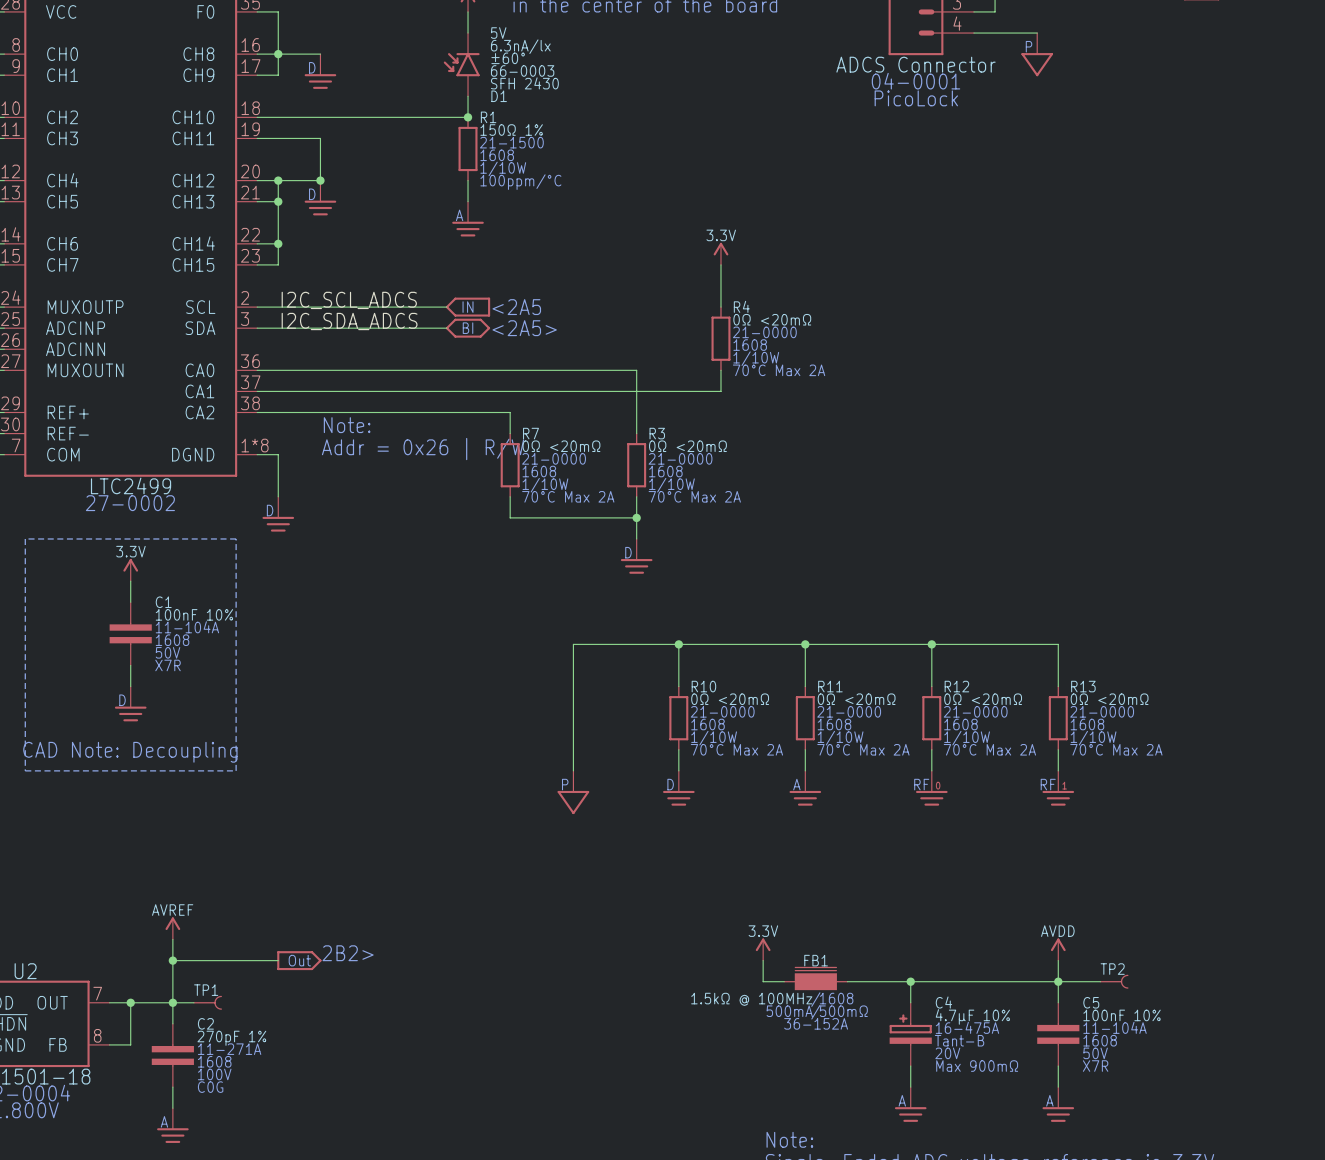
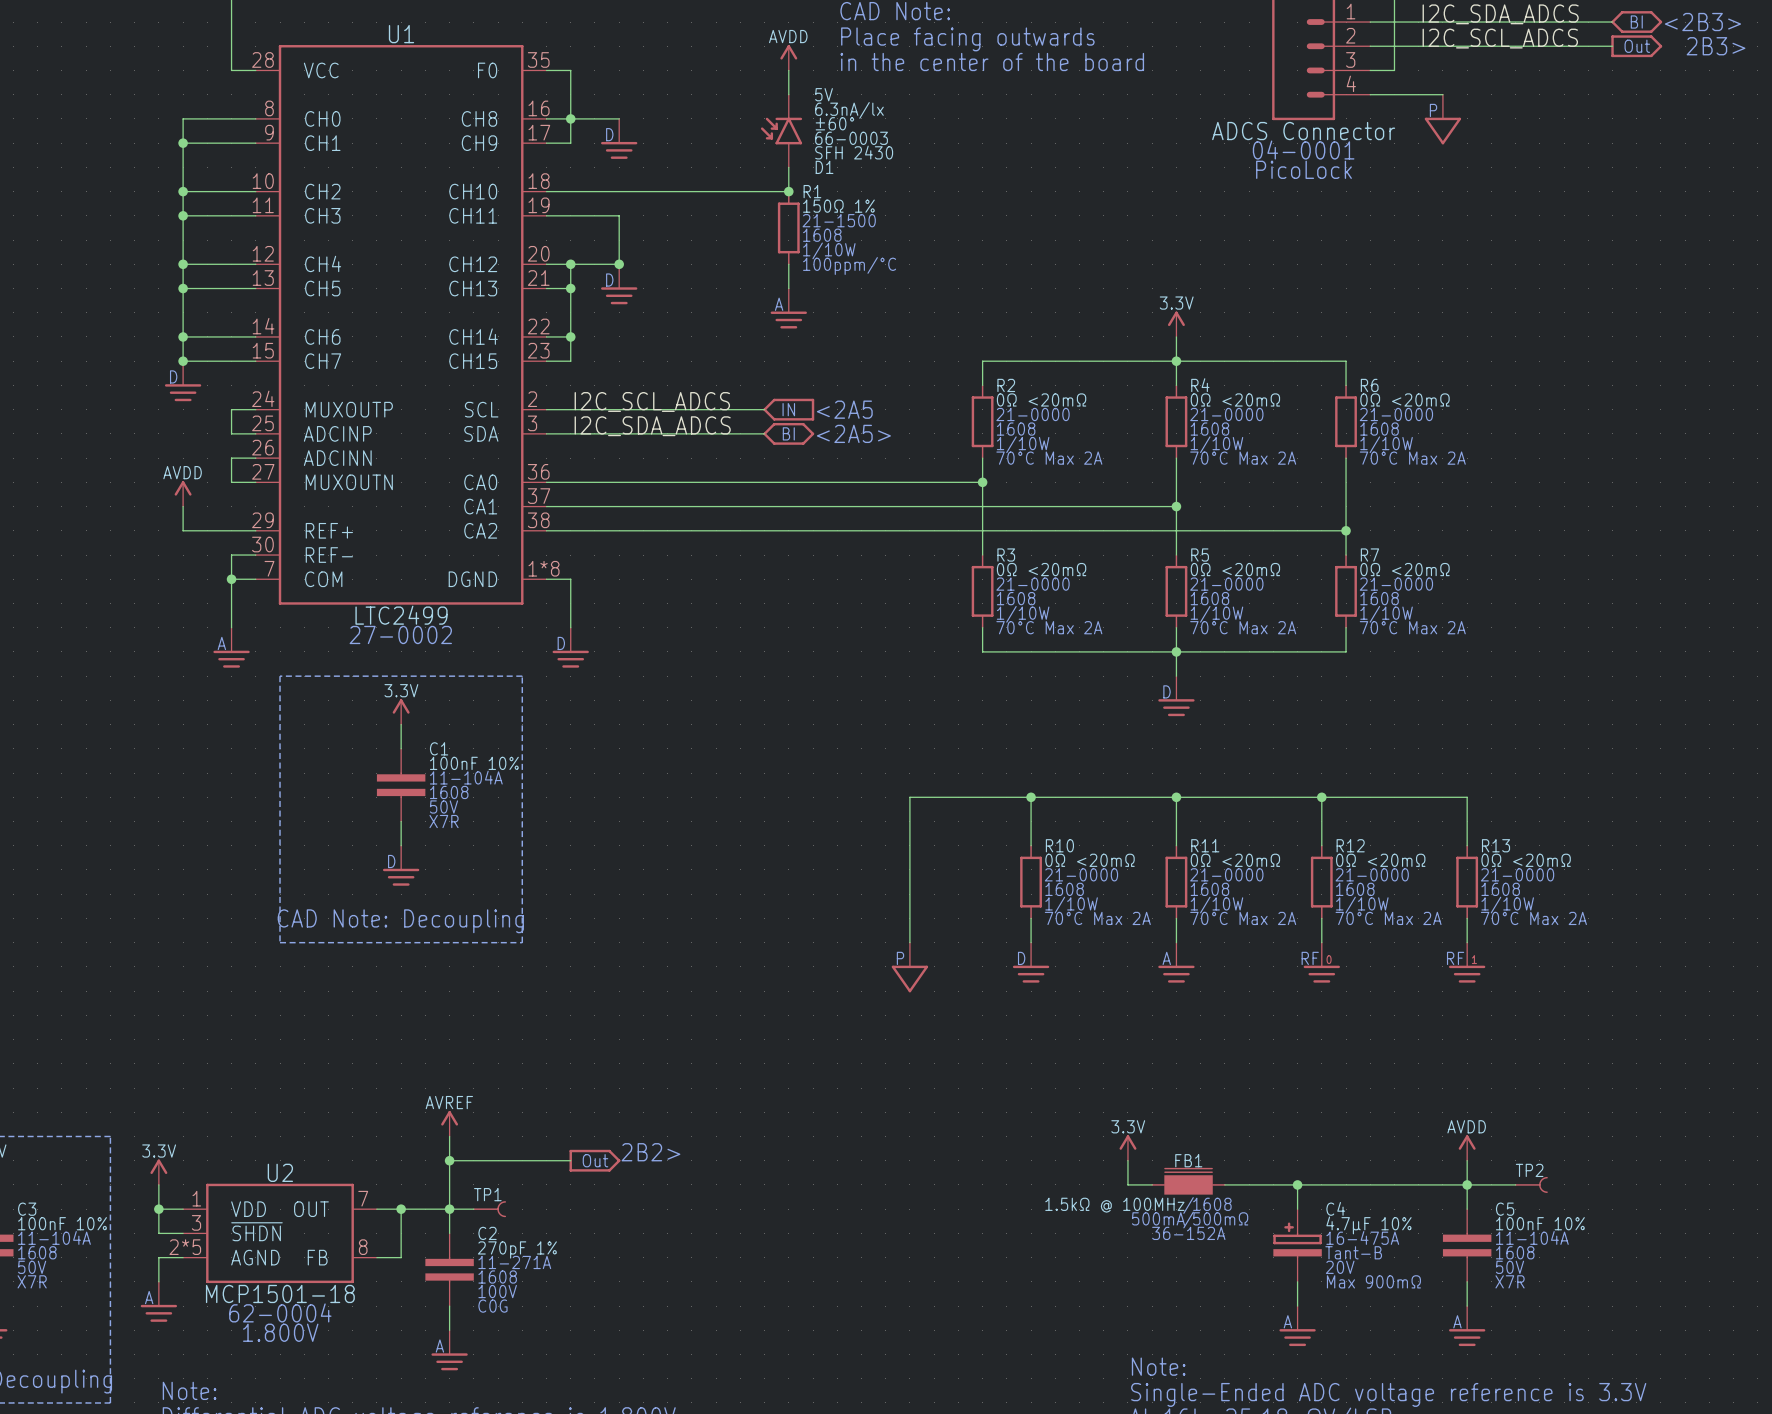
power symbol position: 3.3V (720, 253) -> 3.3V (1176, 324)
wire: (720, 264) (720, 307) -> (1176, 336) (1176, 385)
junction: none -> (1176, 361)
wire: none -> (982, 385) (982, 361) (1346, 361) (1346, 385)
R2: none -> 0Ω <20mΩ (982, 421)
R6: none -> 0Ω <20mΩ (1346, 421)
R4 position: (720, 338) -> (1176, 421)
wire: none -> (982, 458) (982, 482)
wire: none -> (1176, 458) (1176, 555)
wire: none -> (1346, 458) (1346, 555)
junction: none -> (982, 482)
wire: (720, 370) (720, 391) -> (1176, 506) (1079, 506)
junction: none -> (1176, 506)
wire: (510, 412) (510, 433) -> (837, 530) (1346, 530)
junction: none -> (1346, 530)
text: Note: (347, 425) -> none
text: Addr = 0x26 | R/W (423, 449) -> none
R7 position: (510, 465) -> (1346, 591)
R5: none -> 0Ω <20mΩ (1176, 591)
wire: (510, 496) (510, 517) (636, 517) (636, 538) -> none
wire: none -> (1176, 627) (1176, 676)
wire: none -> (1346, 627) (1346, 651) (982, 651)
junction: (636, 517) -> none
junction: none -> (1176, 651)
power symbol position: (636, 556) -> (1176, 696)

